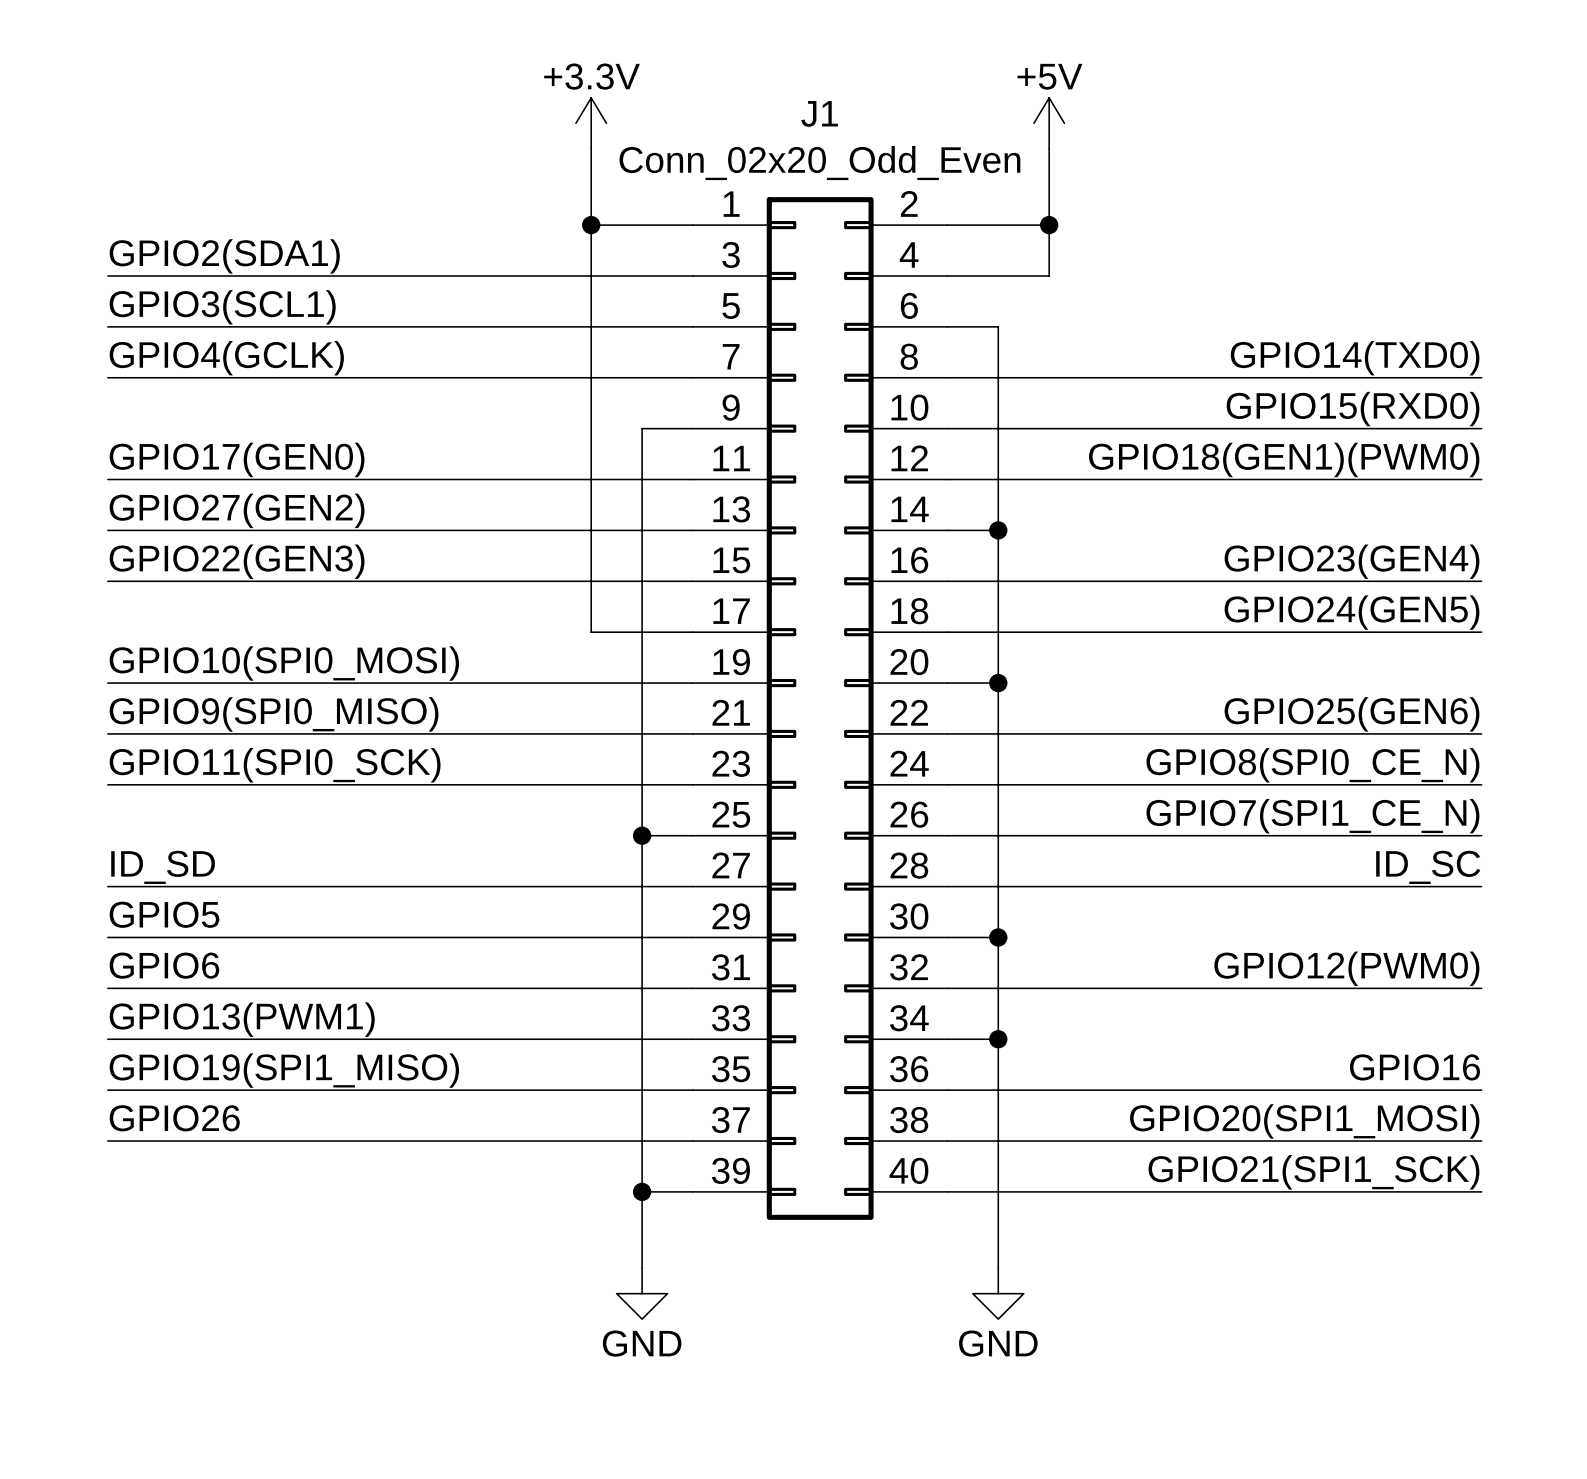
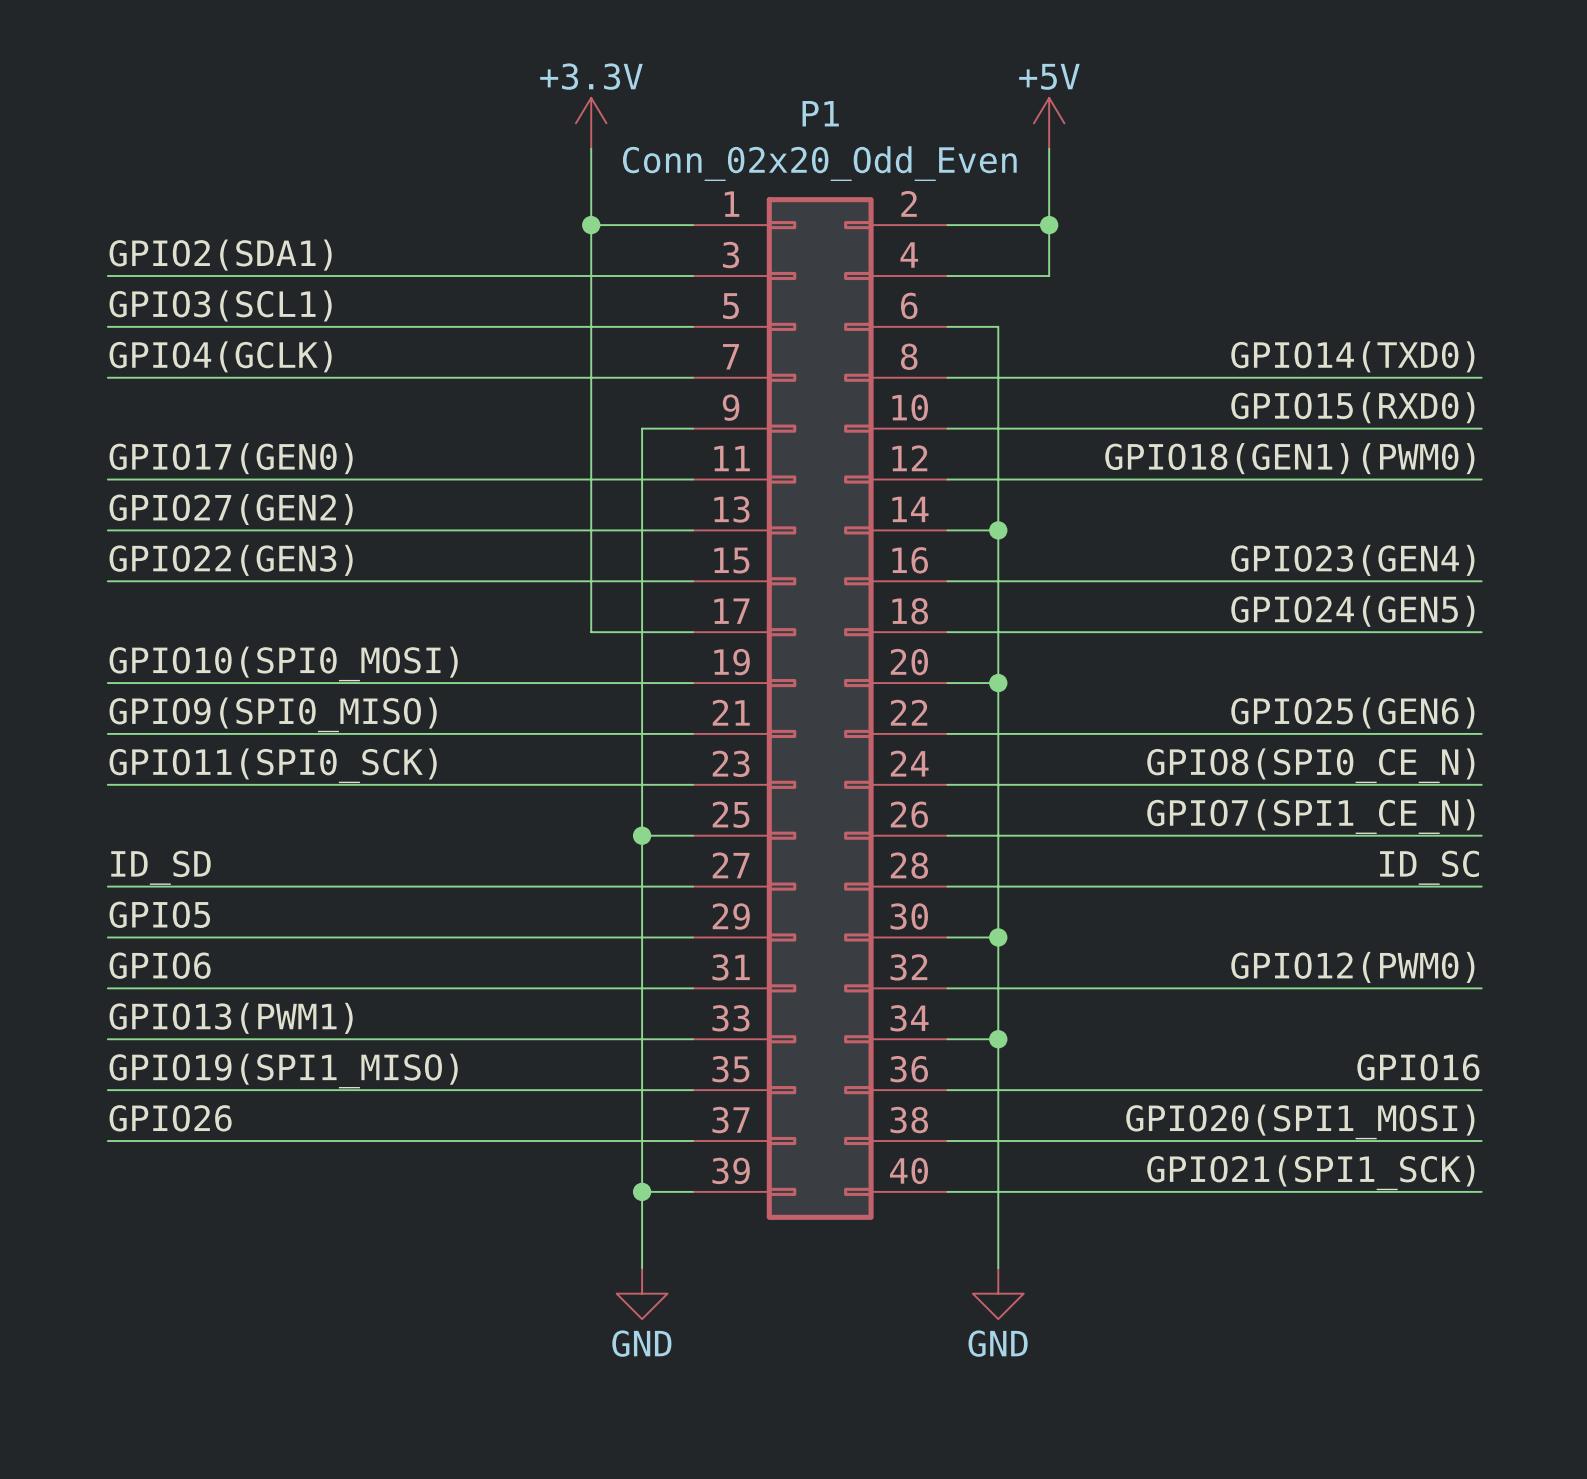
J1 name: J1 (819, 113) -> P1 (820, 113)

